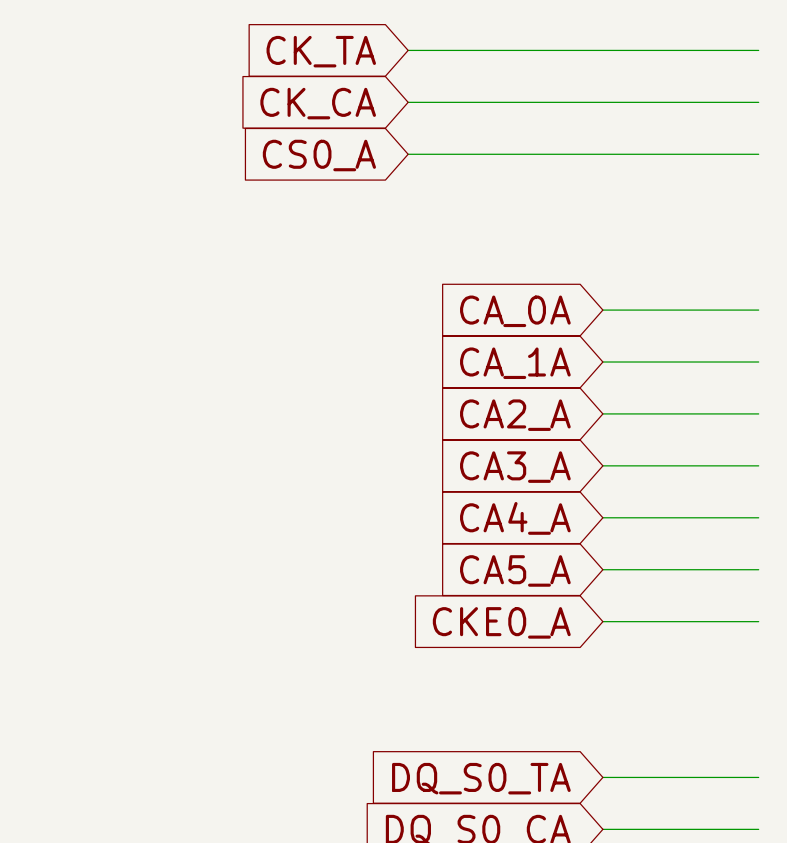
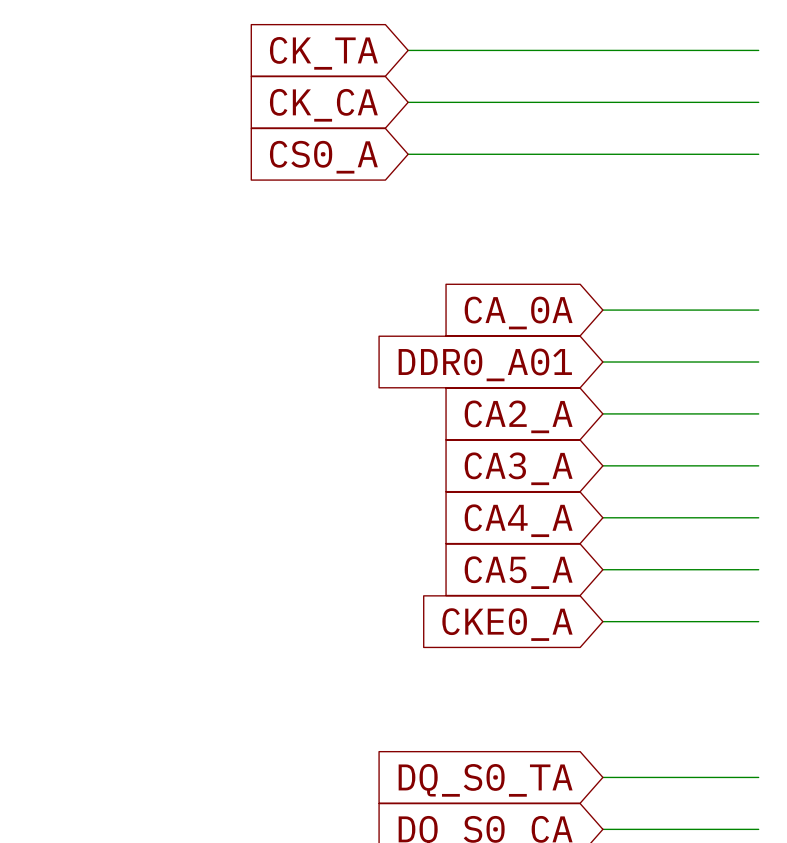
global label: CA_1A (515, 363) -> DDR0_A01 (485, 364)

